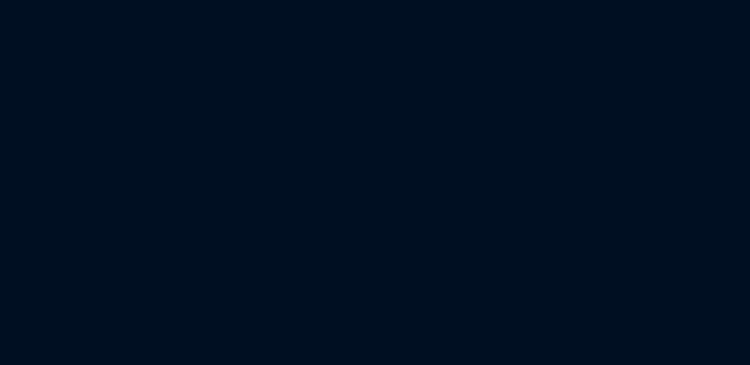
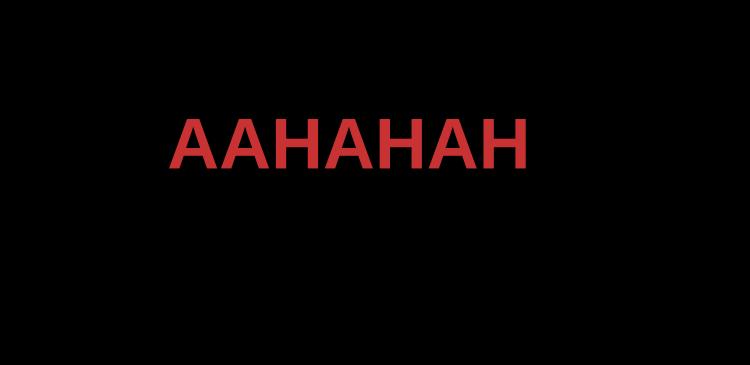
text: none -> AAHAHAH (347, 143)

